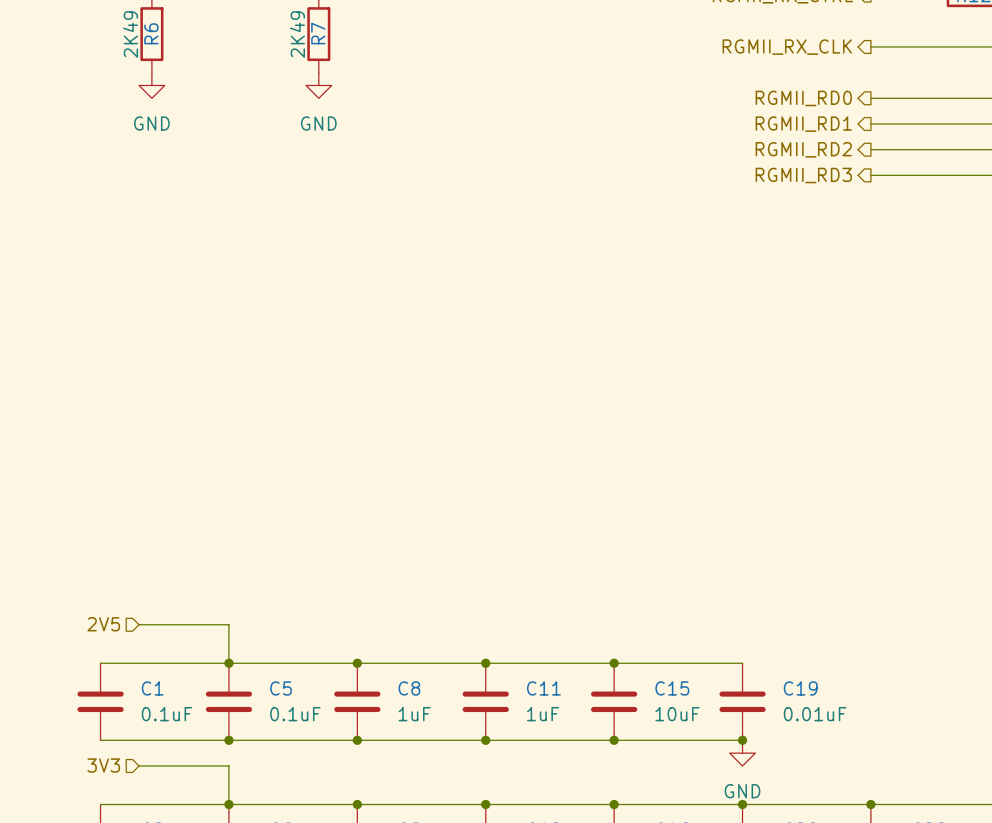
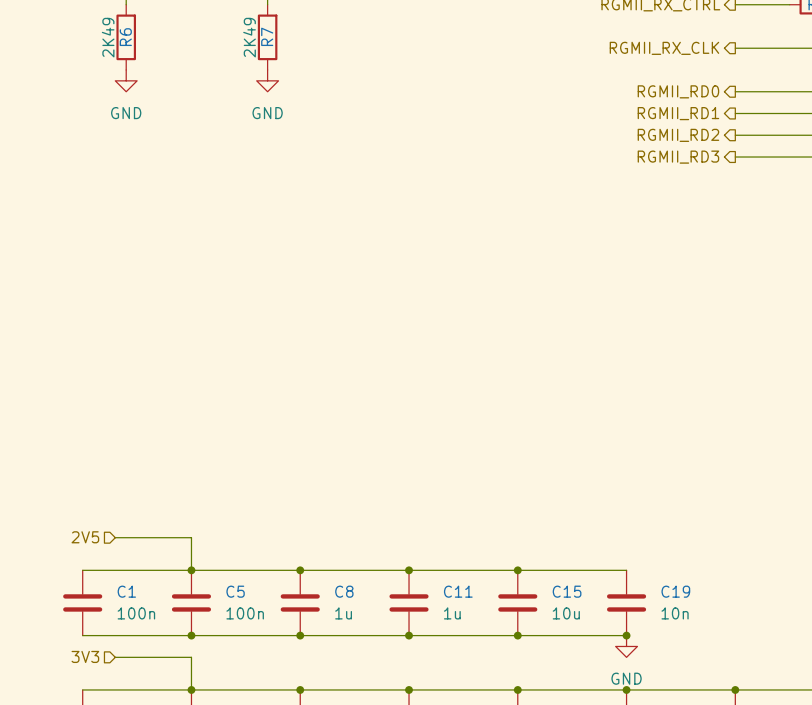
C1 value: 0.1uF (166, 714) -> 100n (136, 613)
C5 value: 0.1uF (295, 714) -> 100n (245, 613)
C8 value: 1uF (414, 714) -> 1u (343, 613)
C11 value: 1uF (543, 714) -> 1u (452, 613)
C15 value: 10uF (677, 714) -> 10u (566, 613)
C19 value: 0.01uF (815, 714) -> 10n (675, 613)

